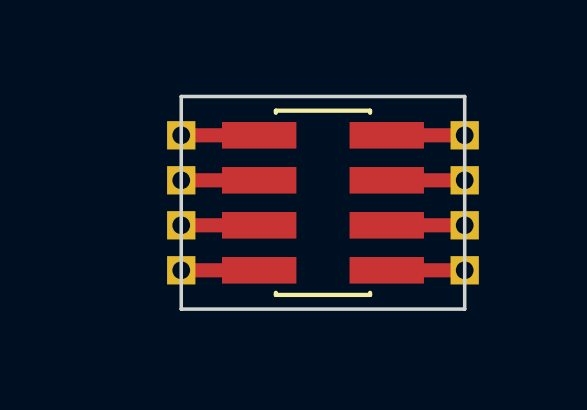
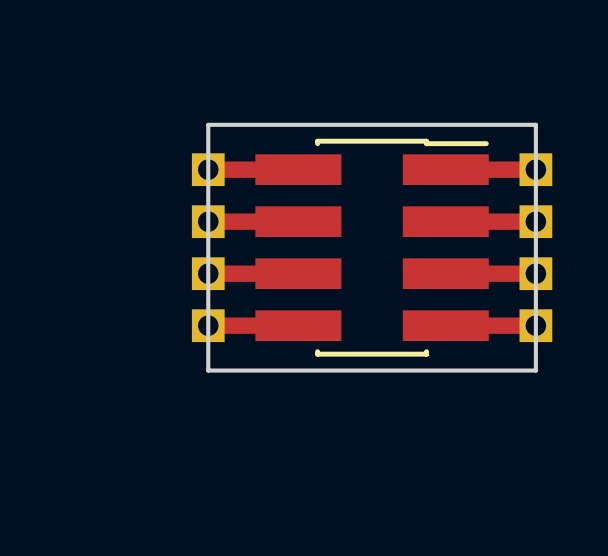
part footprint: [221, 108, 424, 298] -> [255, 138, 489, 357]

